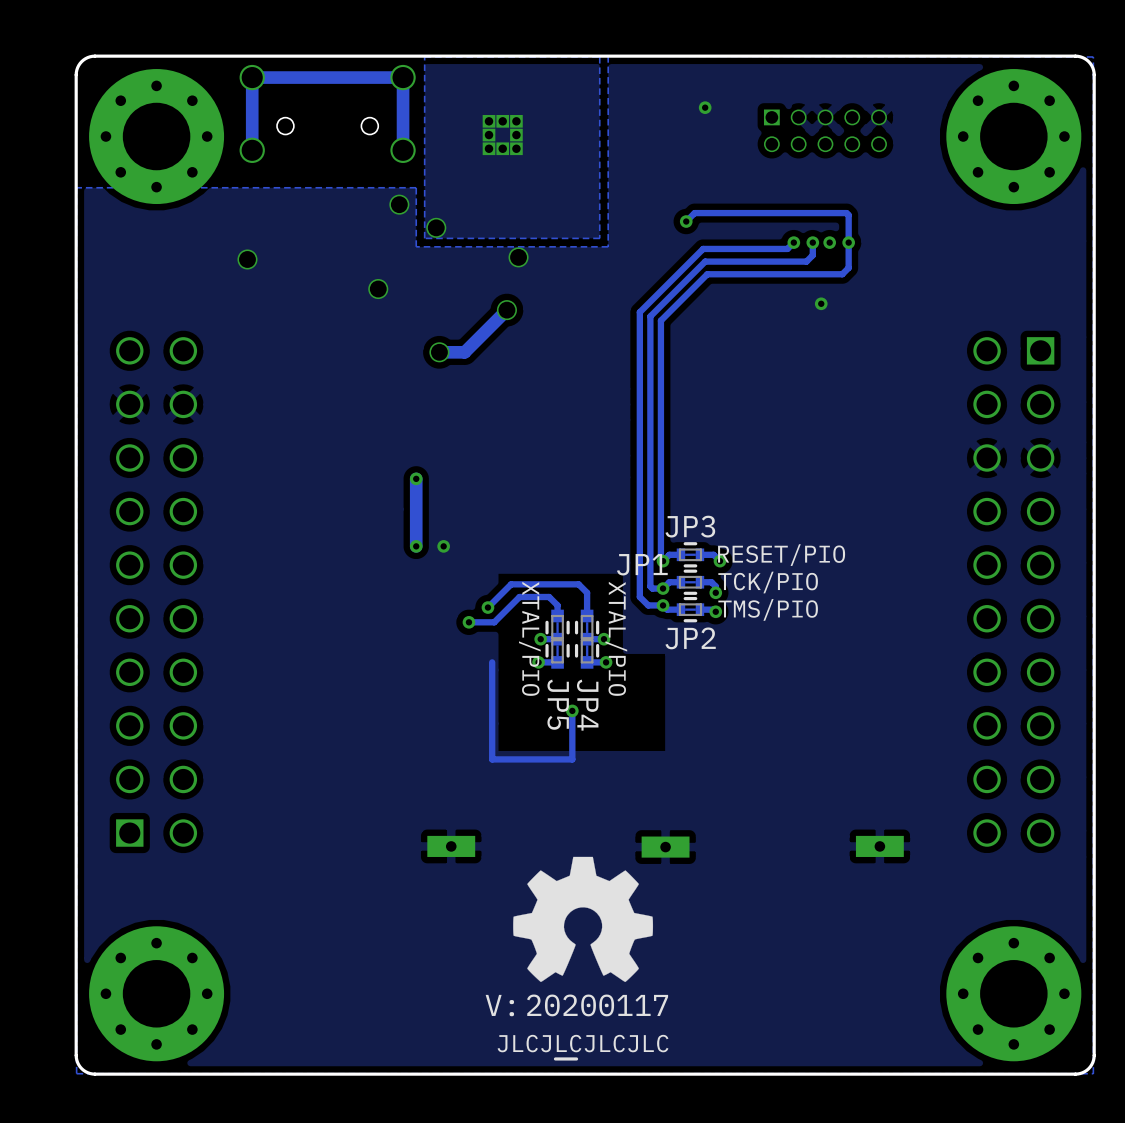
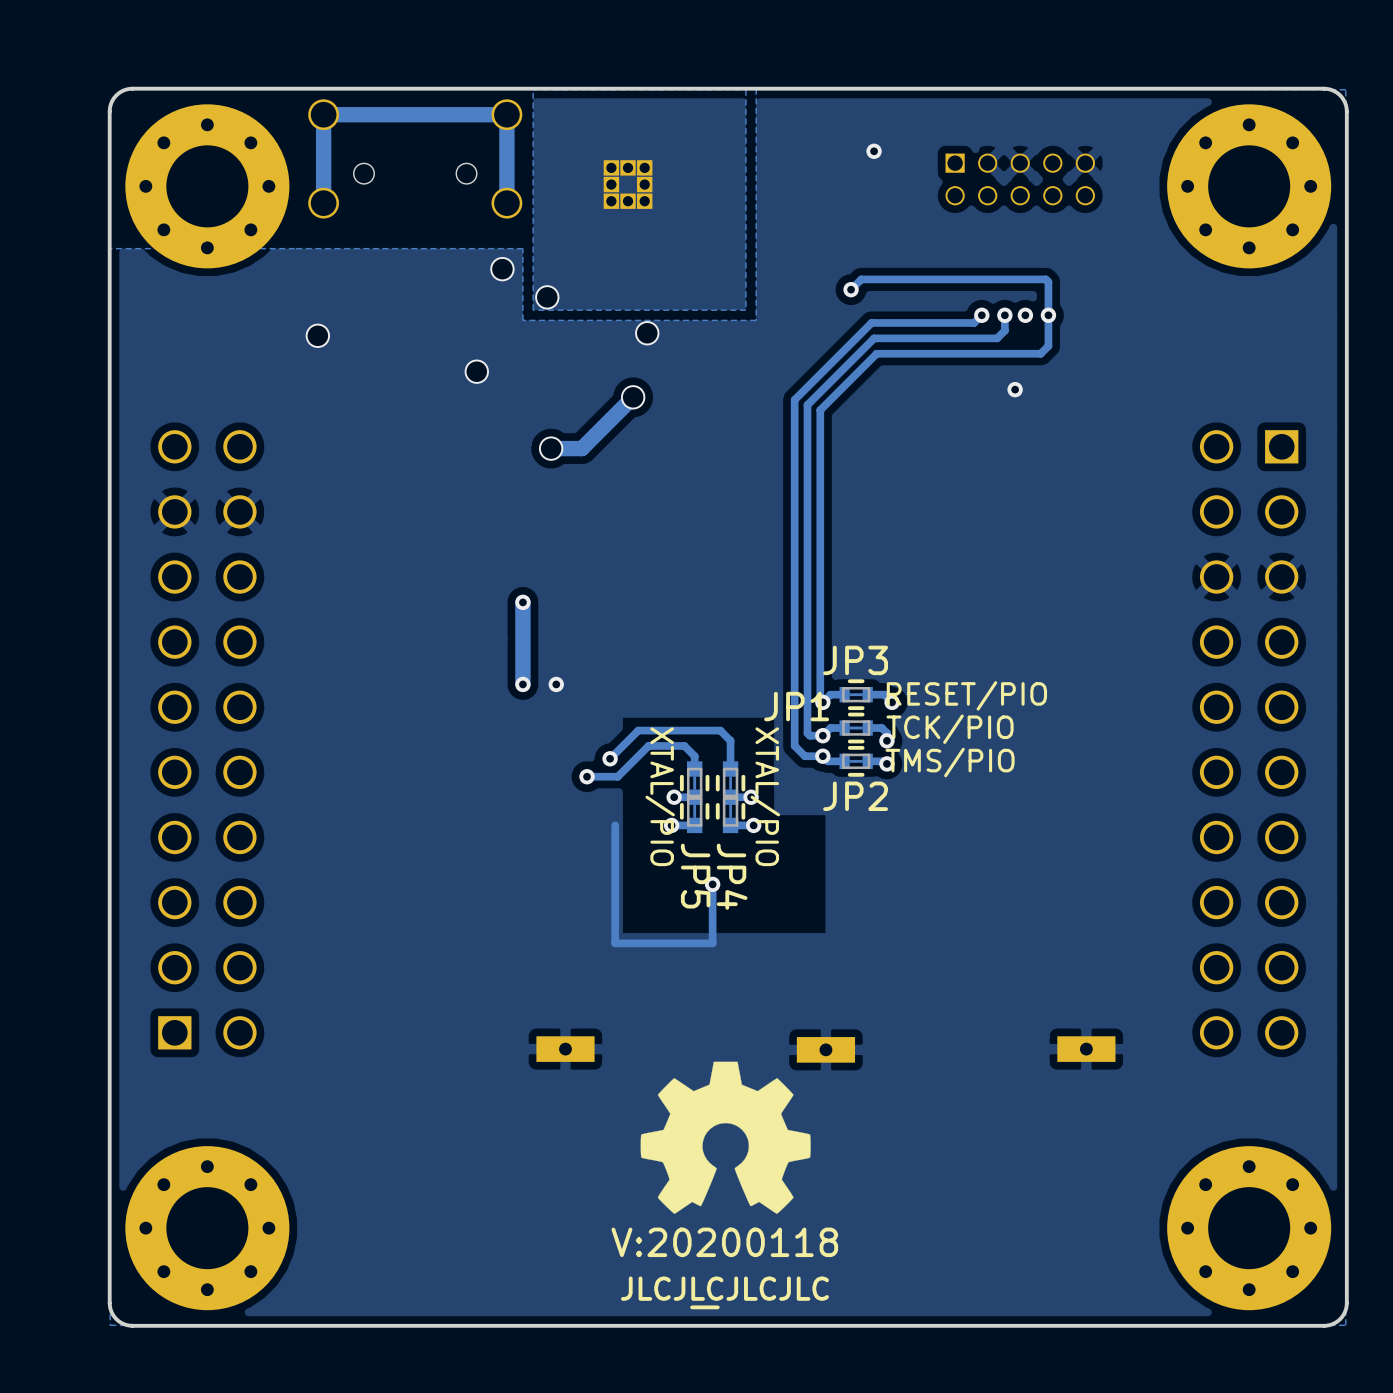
drawing shape: [485, 994, 669, 1017] -> [611, 1227, 839, 1258]

